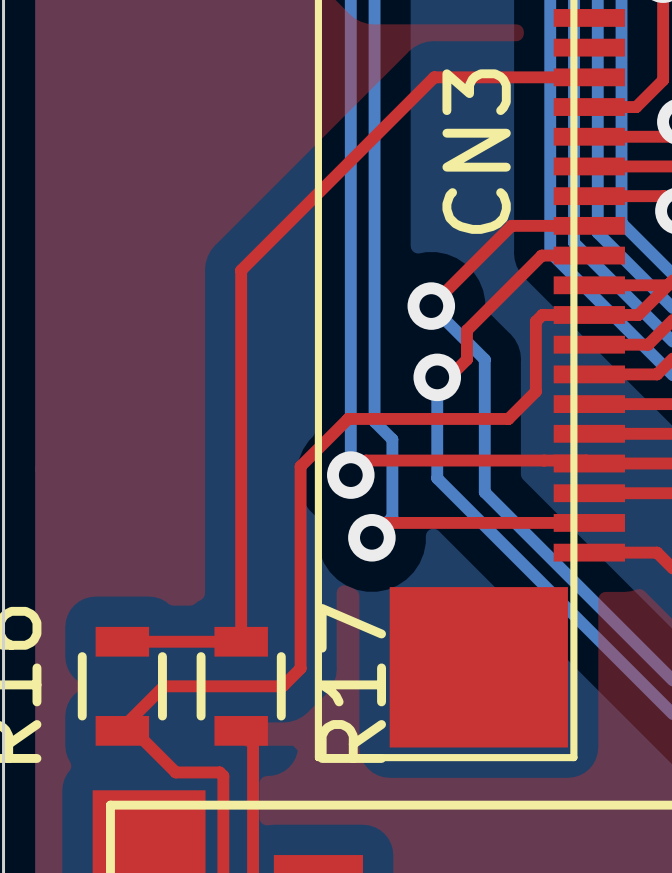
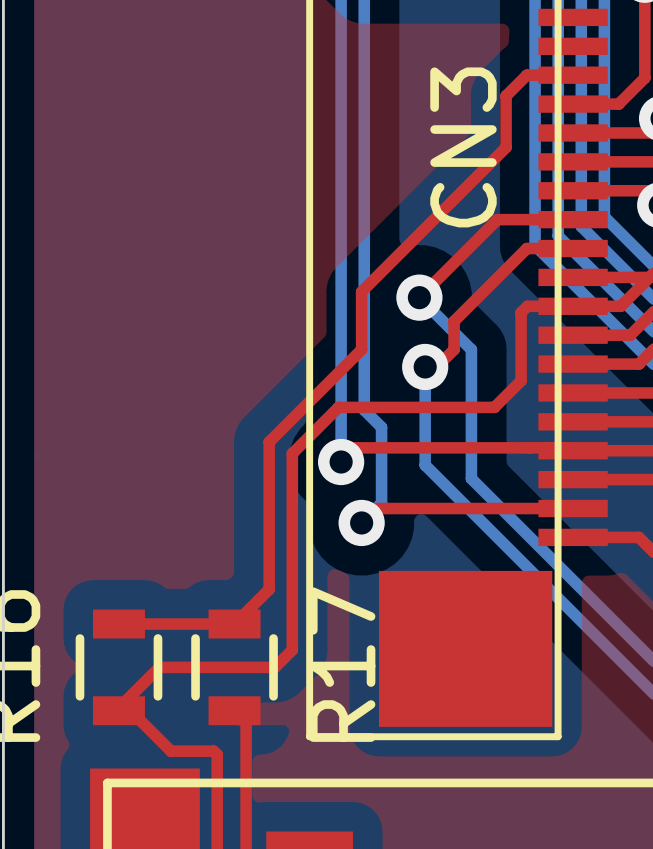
top track: (541, 77) (434, 77) (241, 270) (241, 641) -> (526, 75) (506, 96) (506, 147) (361, 291) (361, 349) (269, 442) (269, 589) (234, 624)

